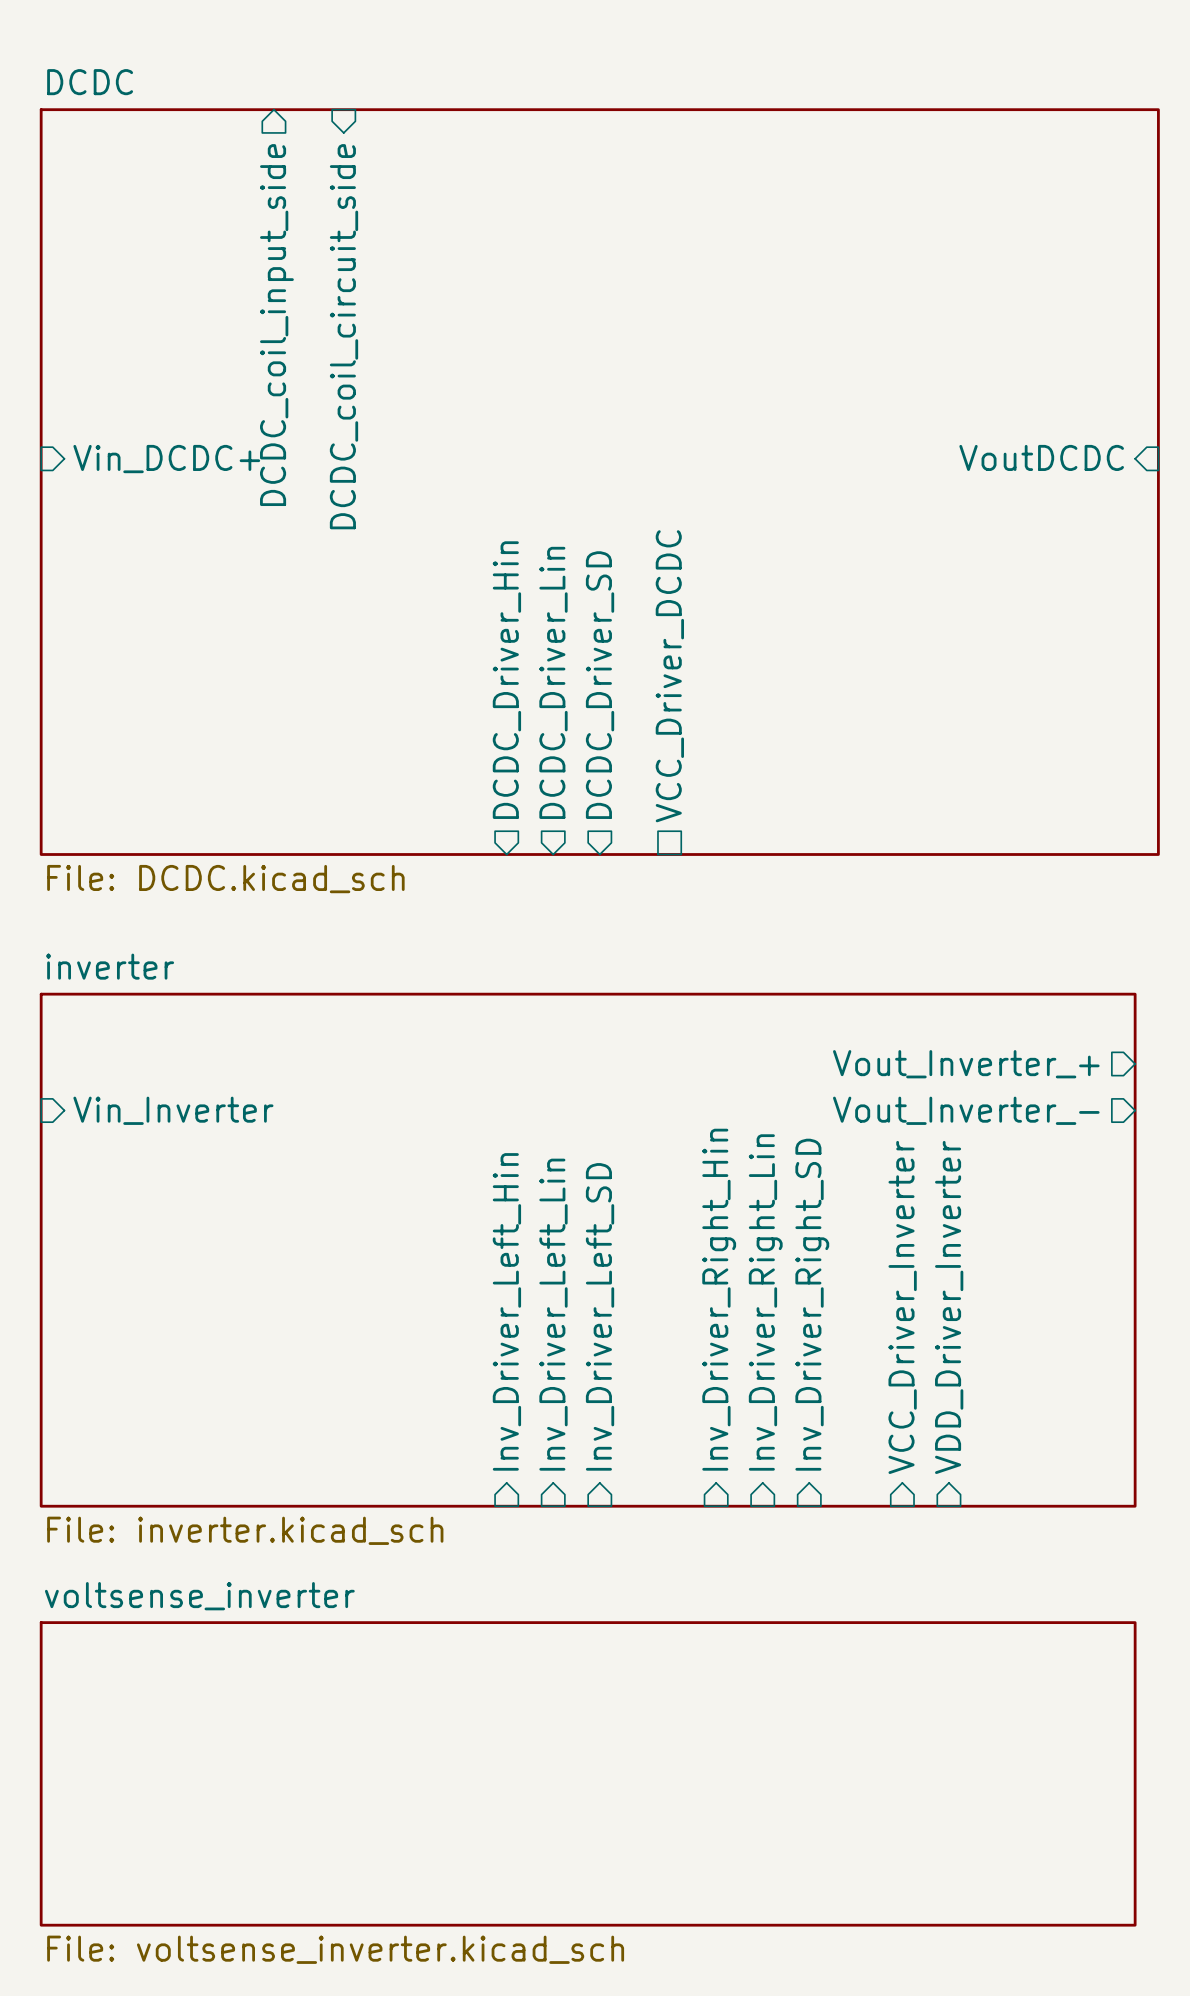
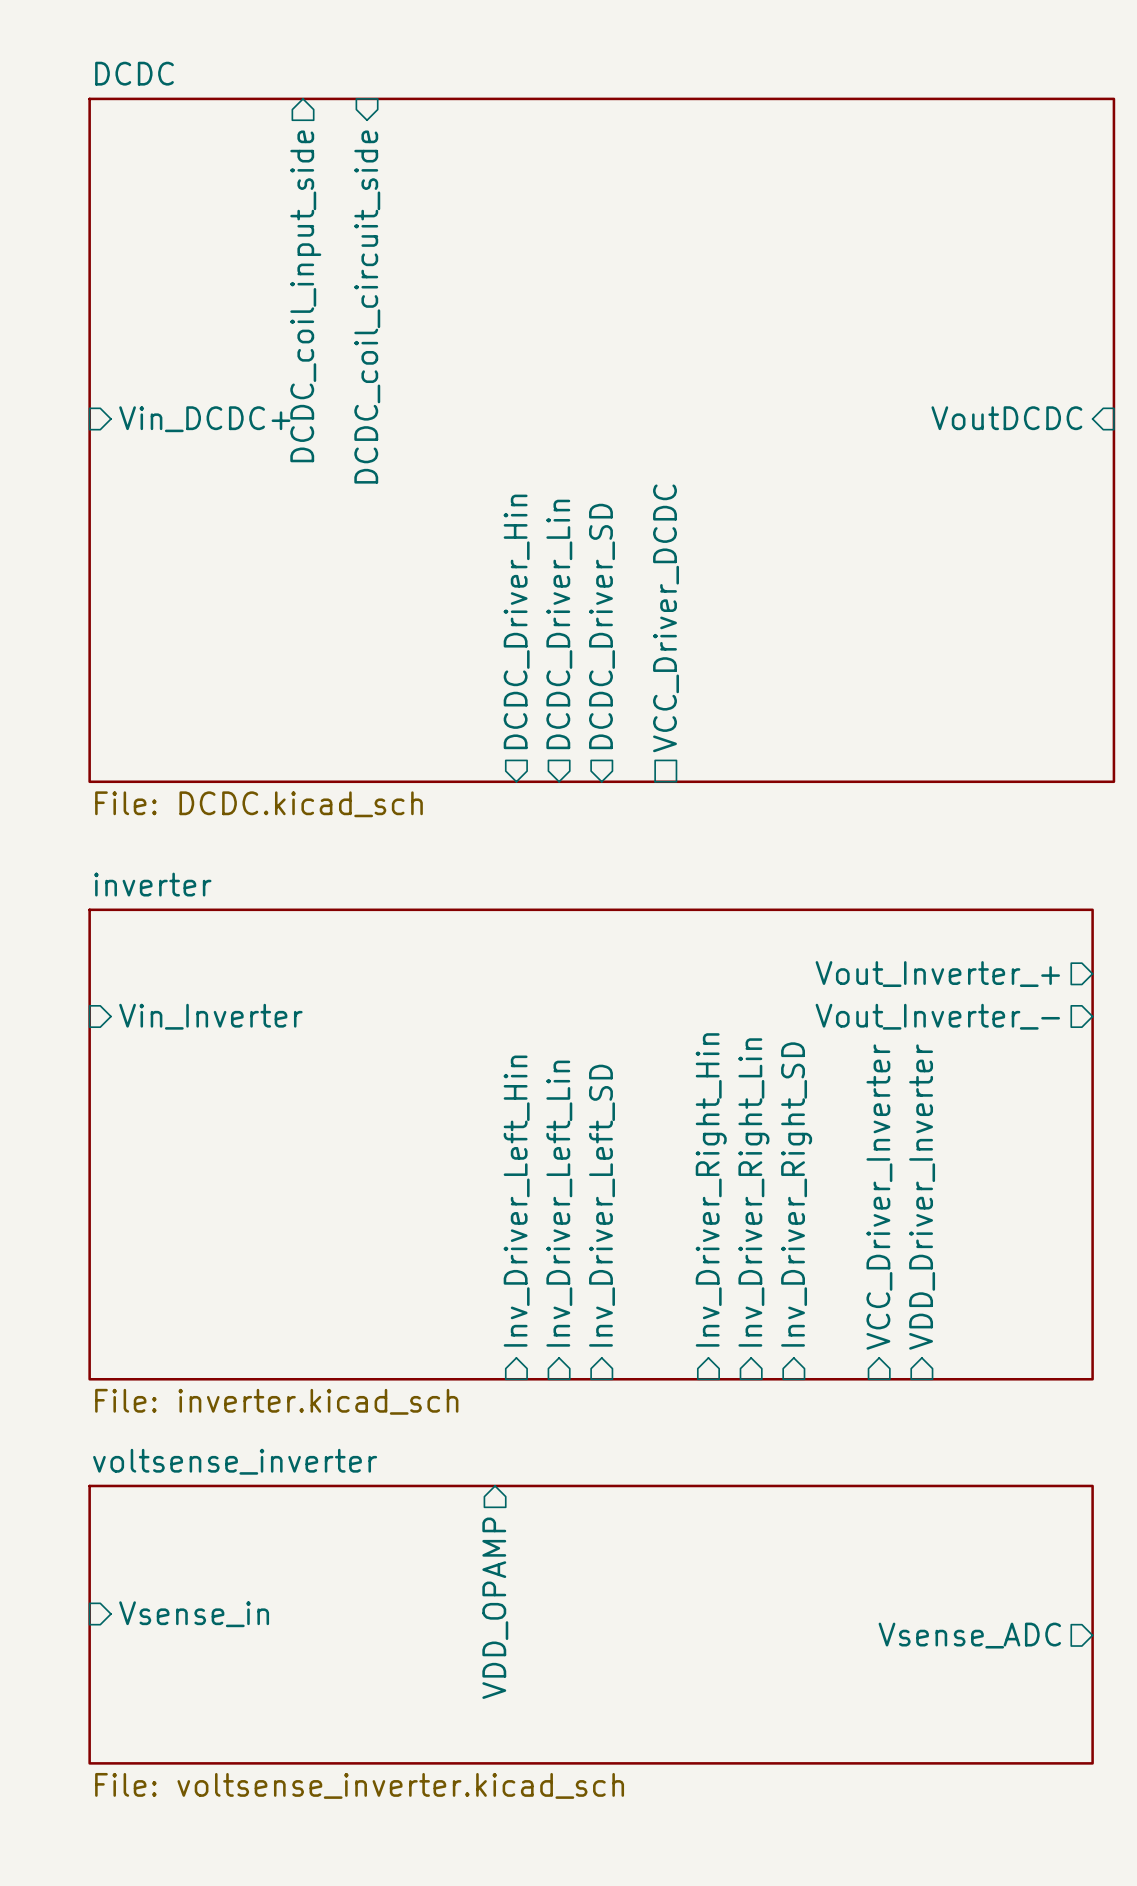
sheet pin: none -> VDD_OPAMP (495, 1608)
sheet pin: none -> Vsense_in (194, 1614)
sheet pin: none -> Vsense_ADC (969, 1635)

